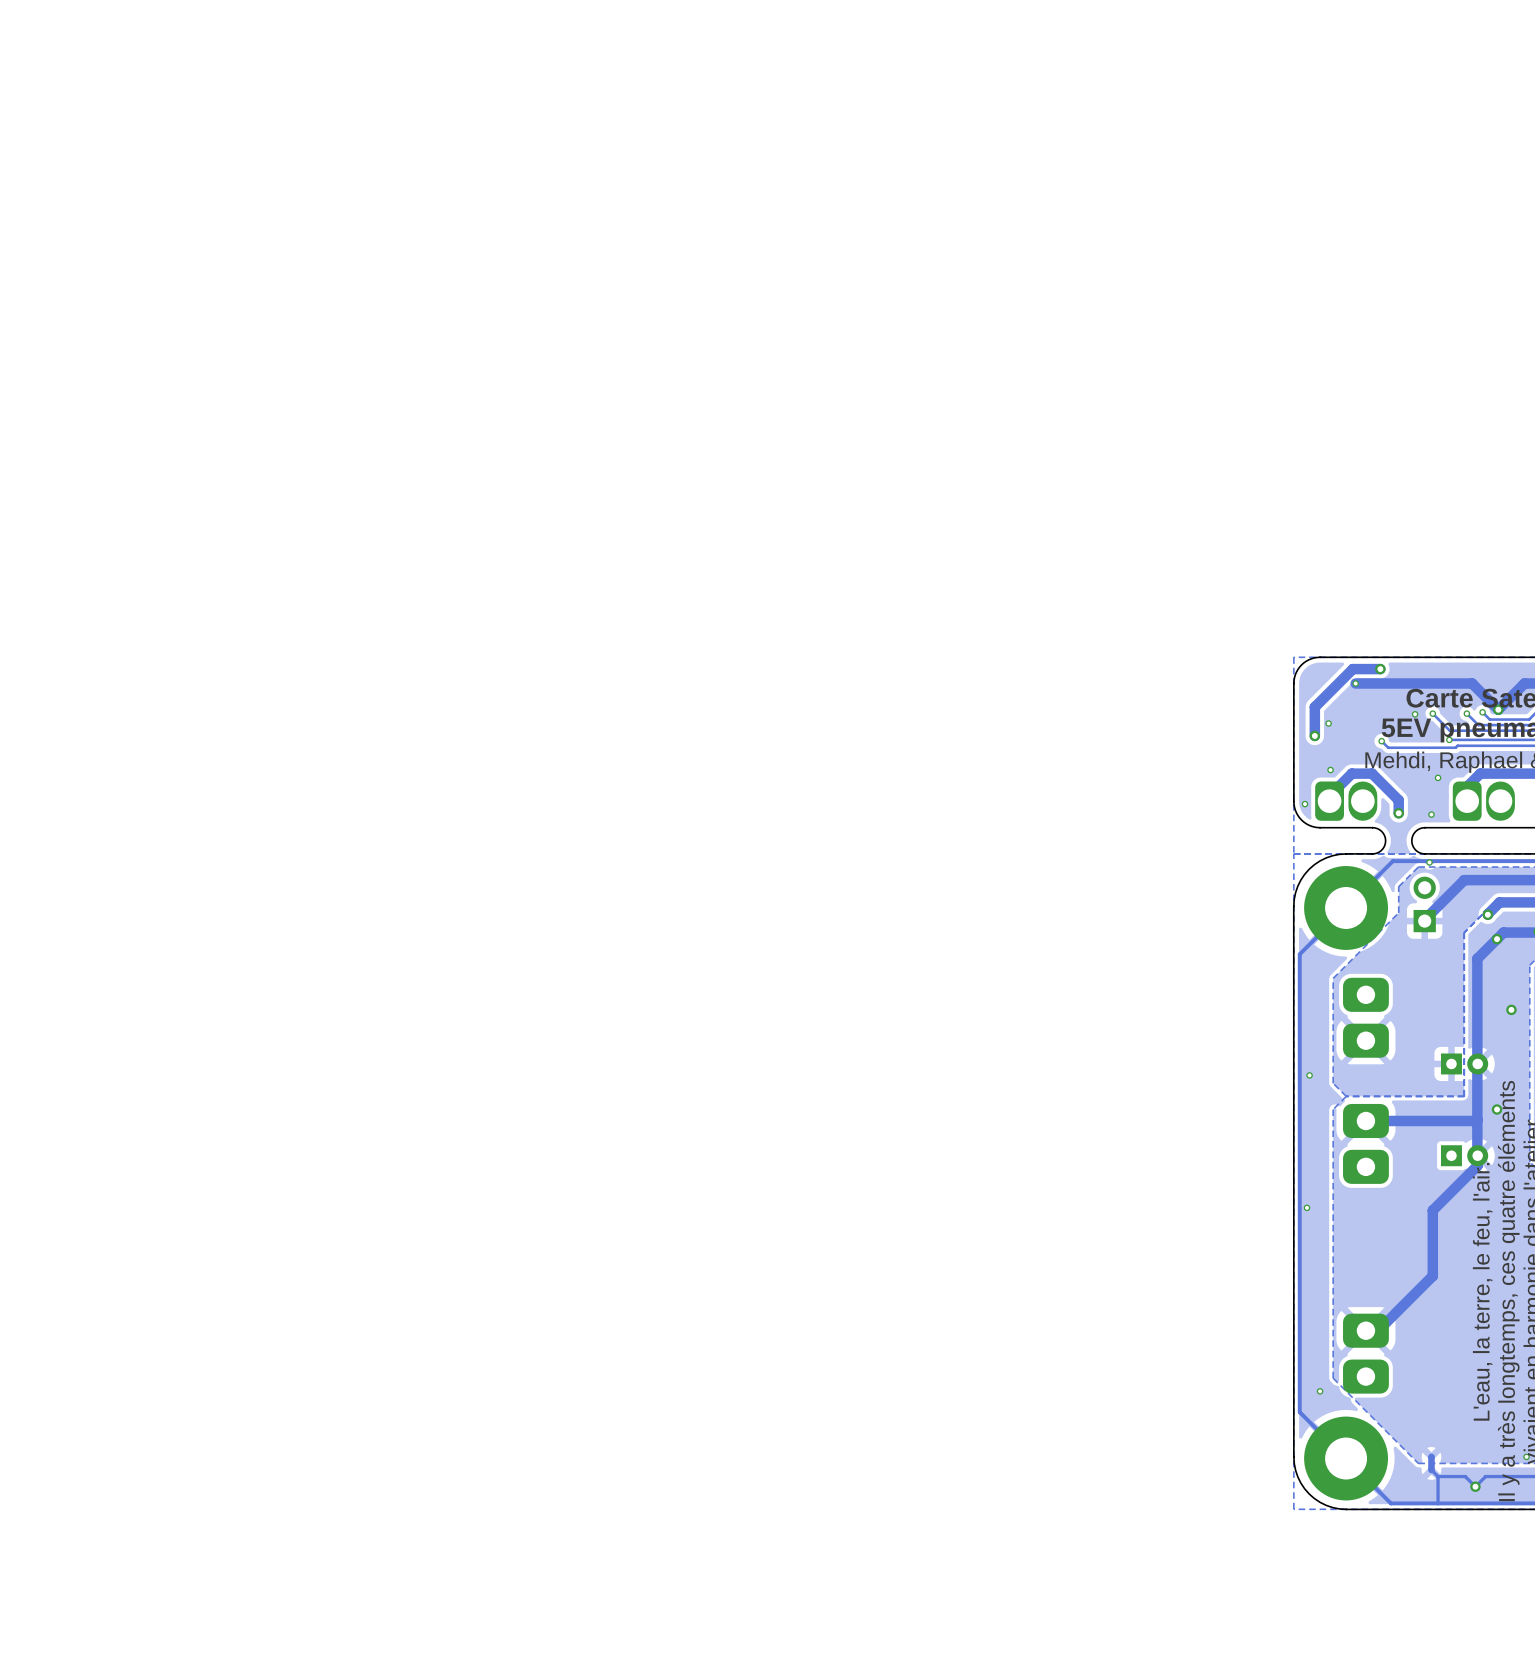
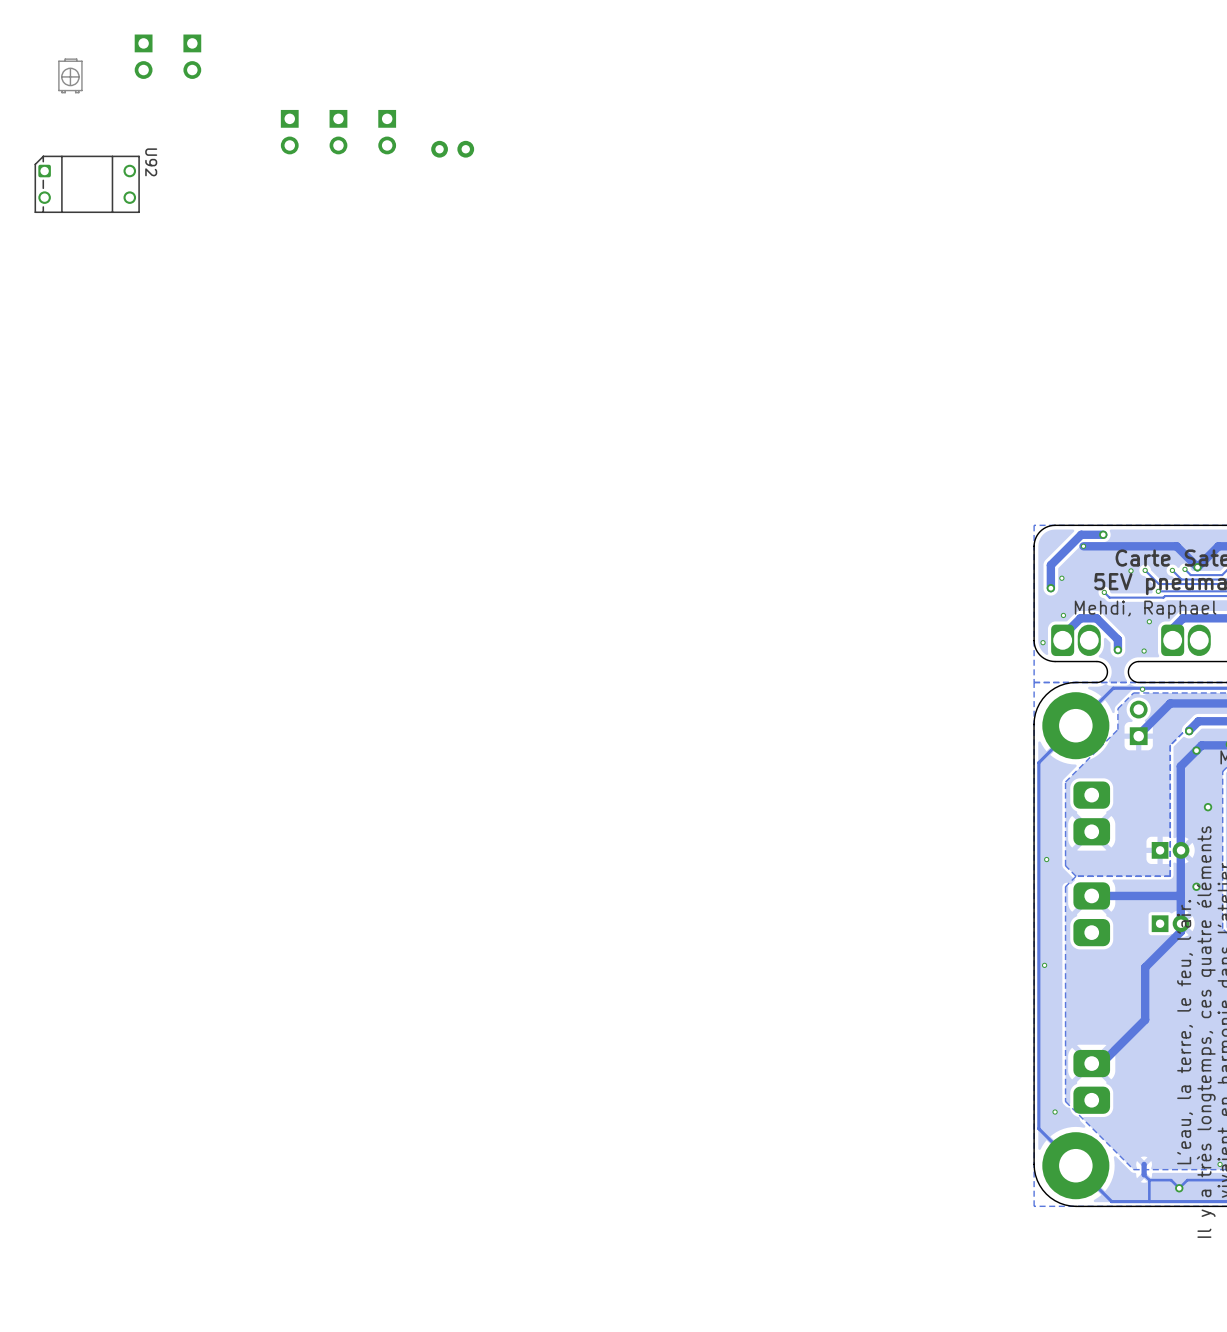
part: none -> (143, 56)
part: none -> (192, 56)
part: none -> (70, 75)
part: none -> (289, 132)
part: none -> (338, 132)
part: none -> (387, 132)
part: none -> (452, 149)
U92: none -> (87, 184)

